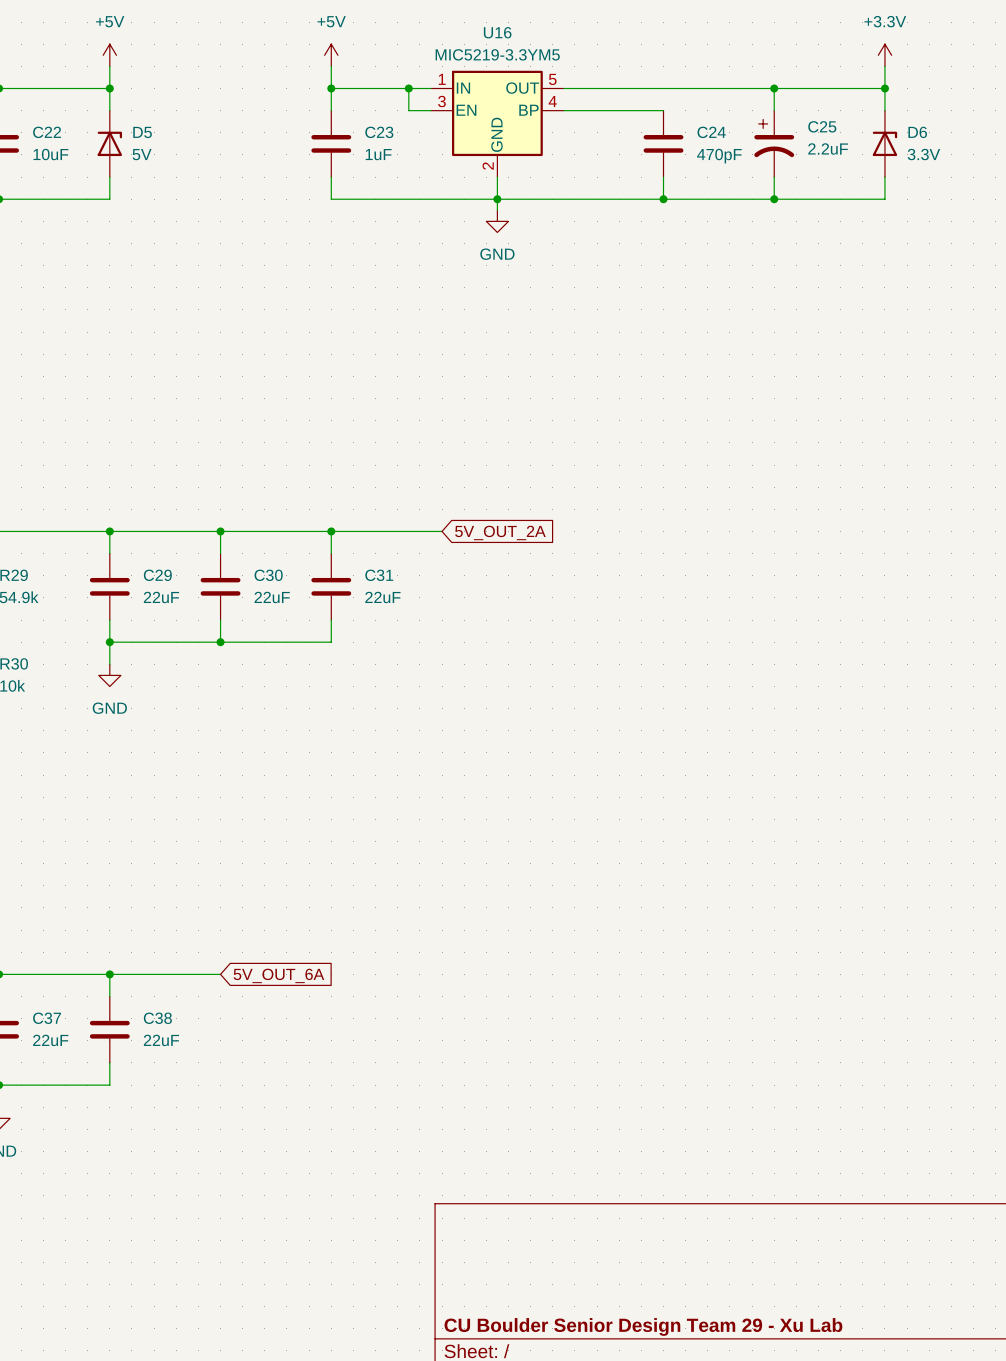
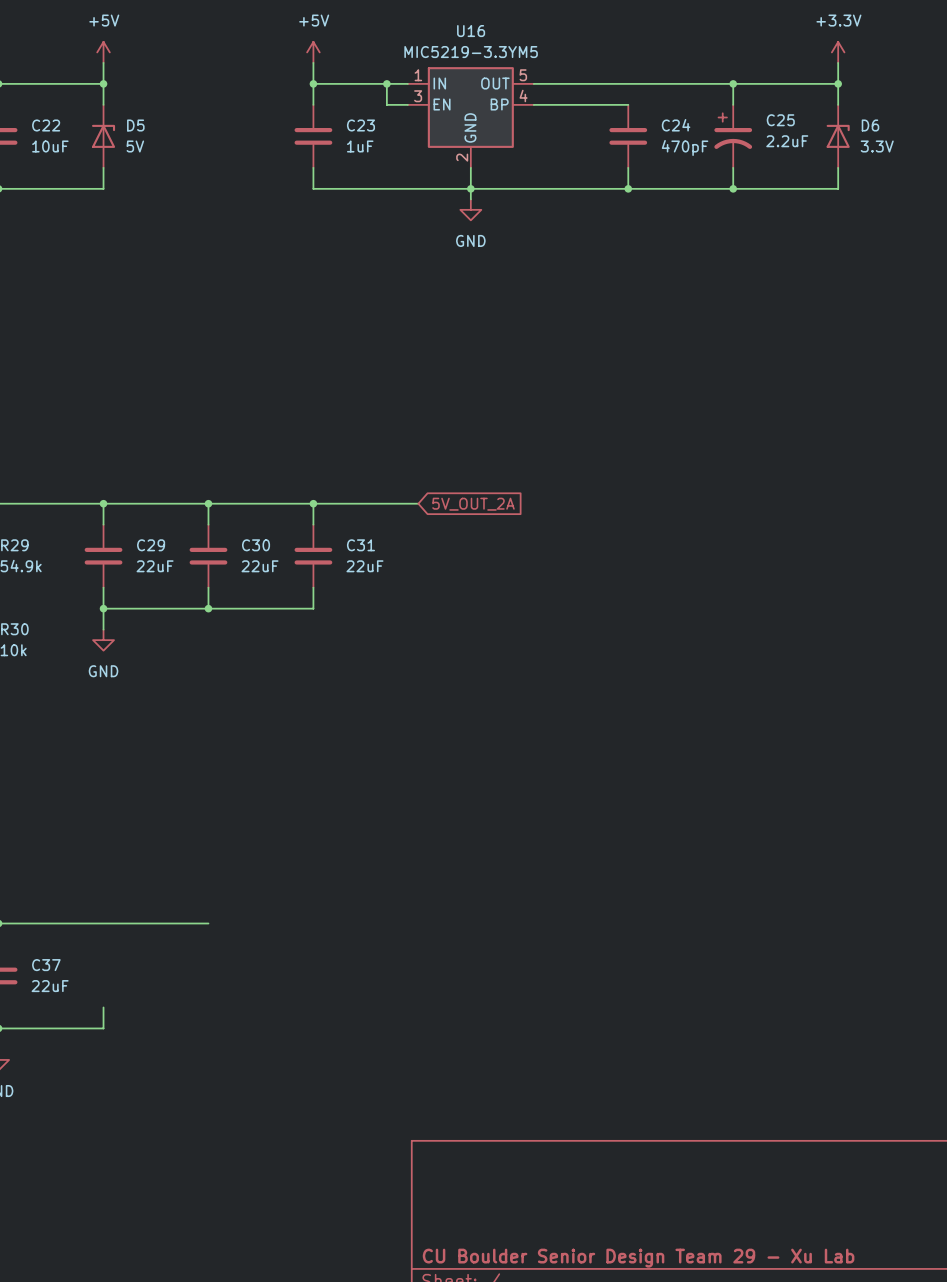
wire: (109, 974) (109, 996) -> none
junction: (109, 974) -> none
global label: 5V_OUT_6A (278, 975) -> none
C38: 22uF (109, 1029) -> none

